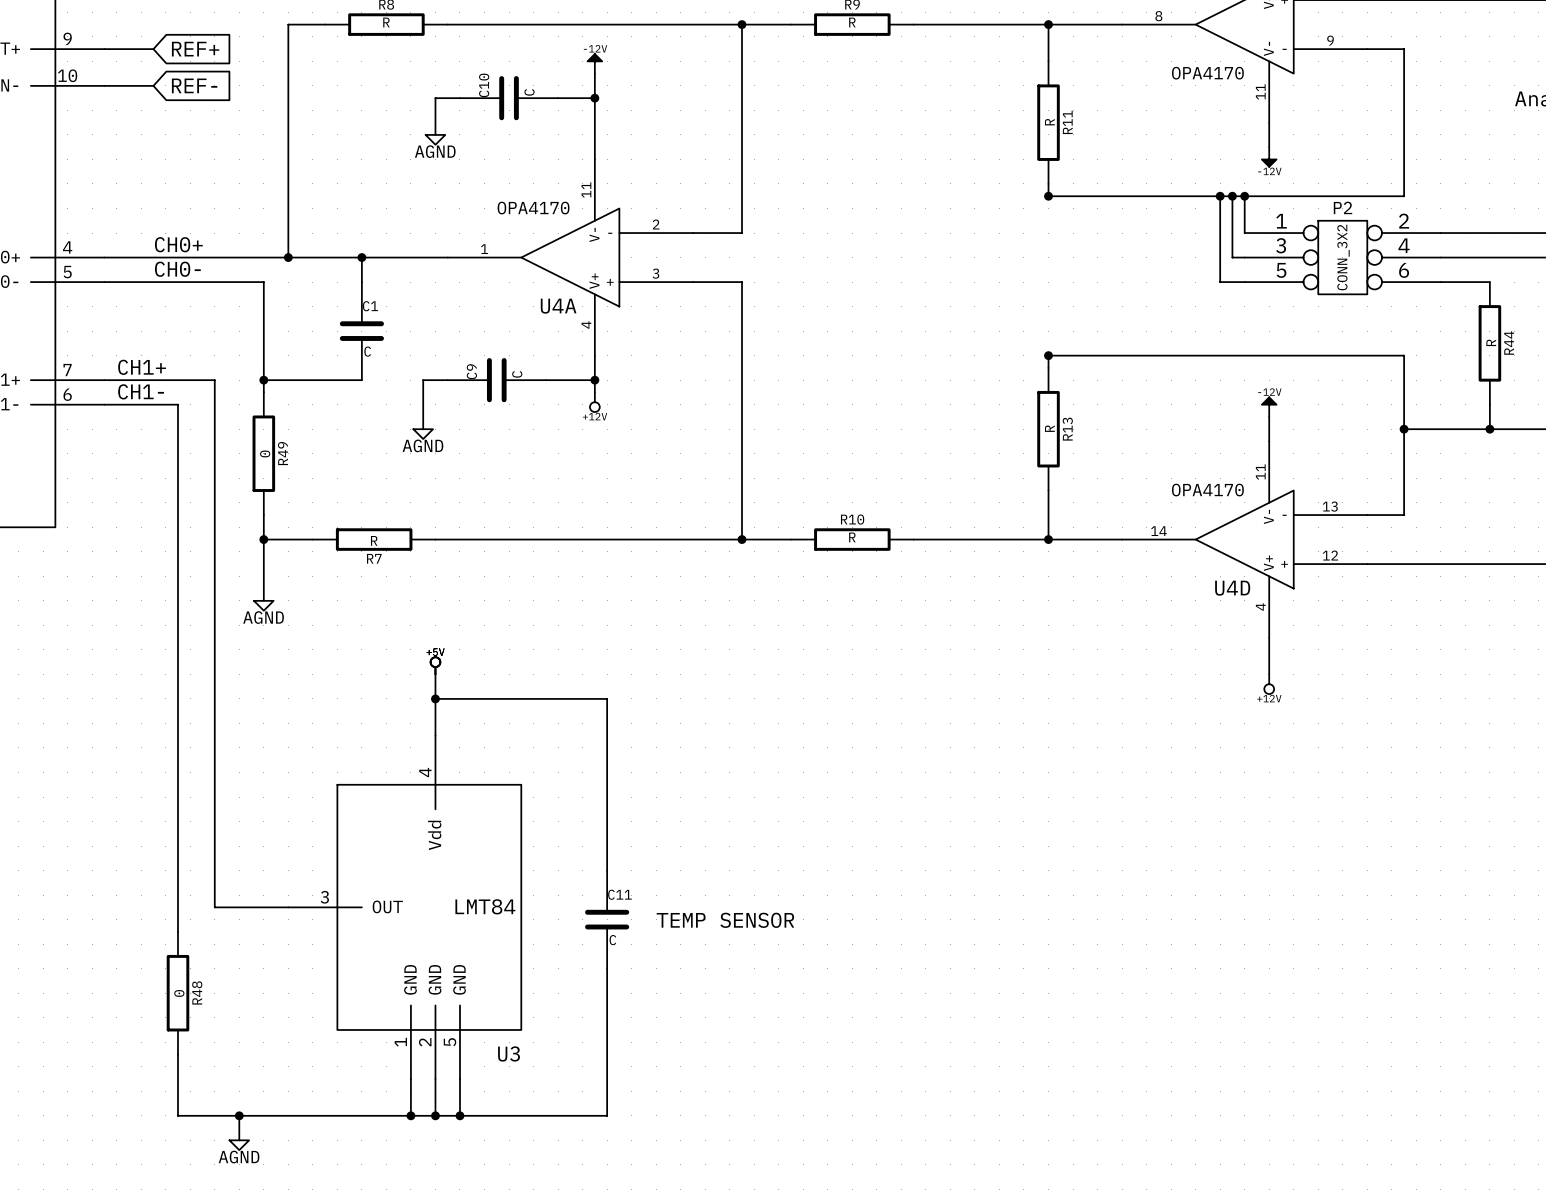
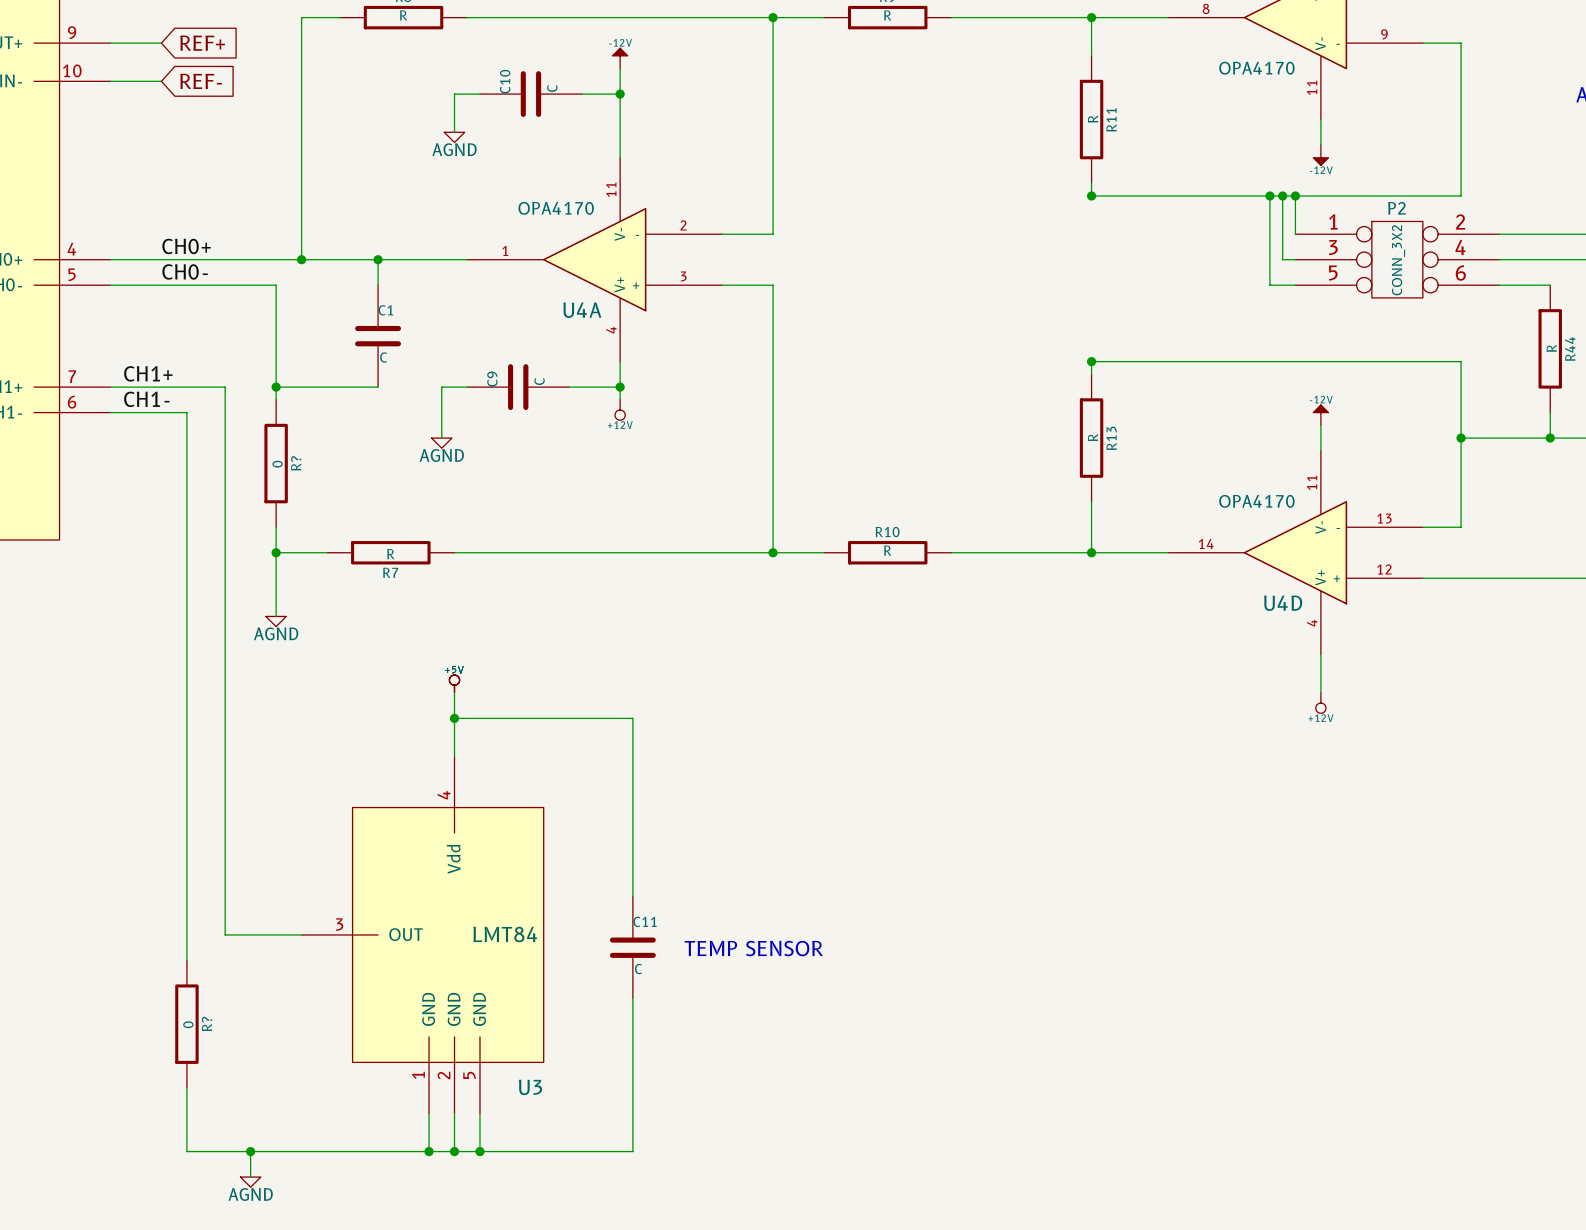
R49 name: R49 (282, 453) -> R? (296, 463)
R48 name: R48 (197, 992) -> R? (207, 1023)

